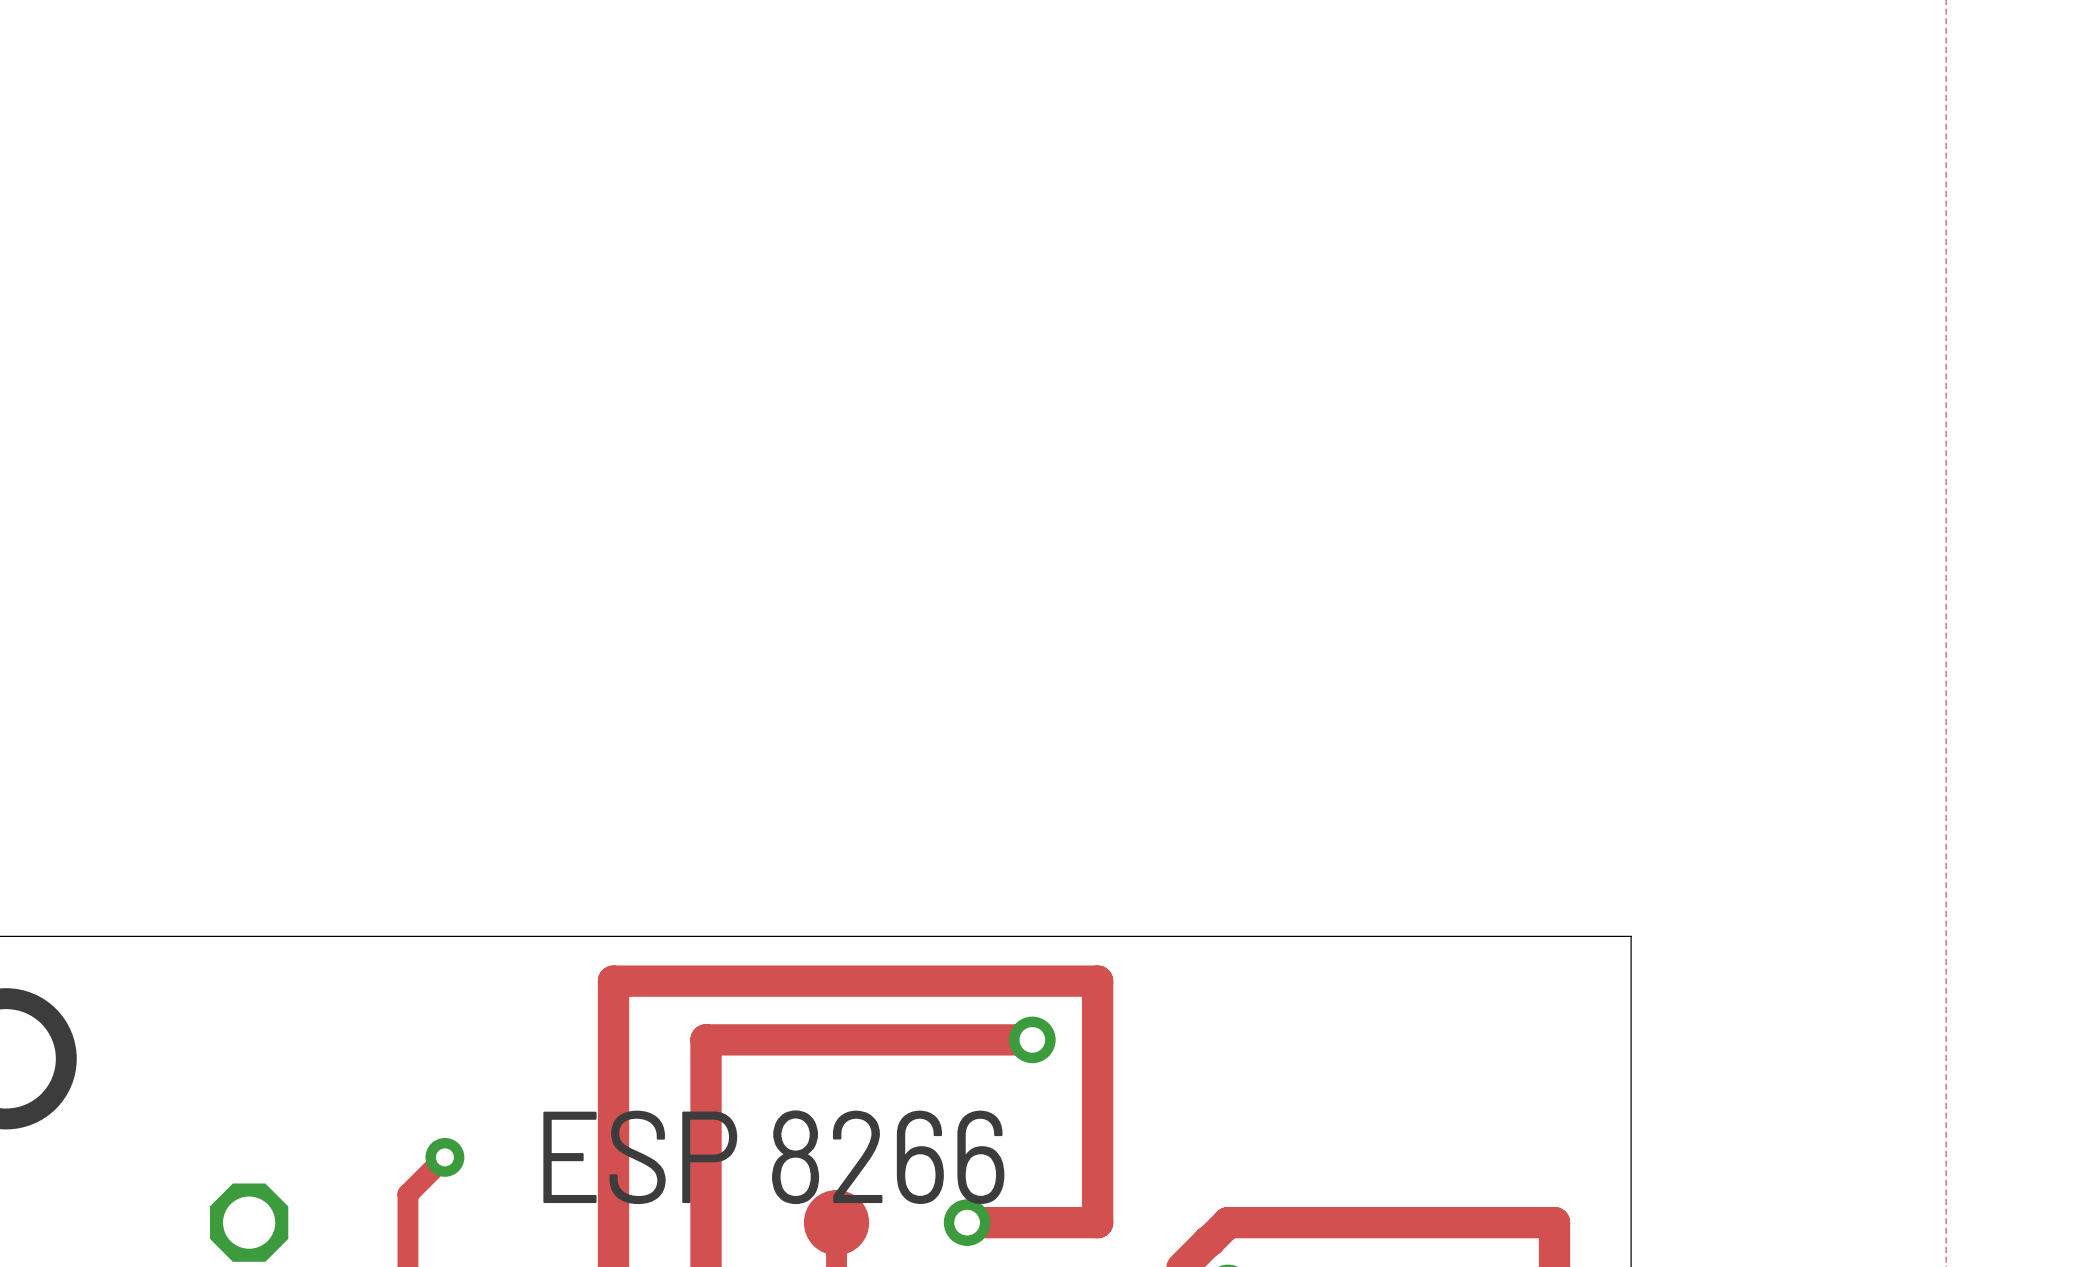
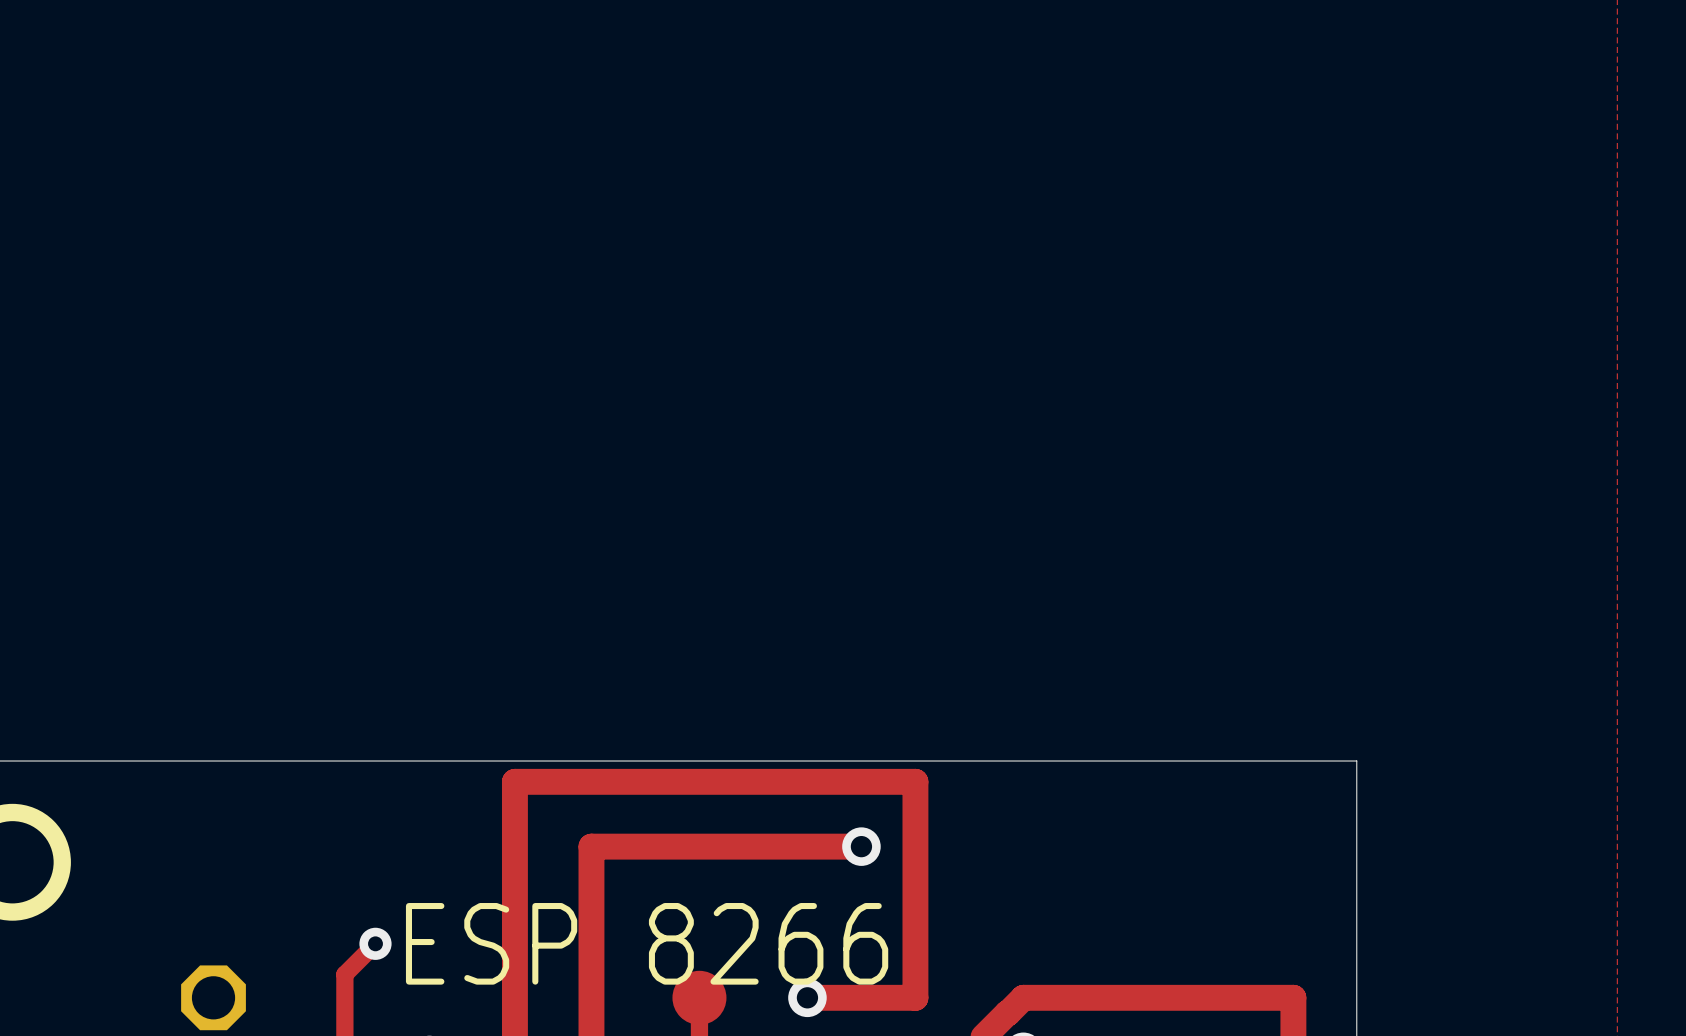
track: (613, 981) (1097, 981) -> (514, 798) (514, 781) (915, 781) (915, 798)

